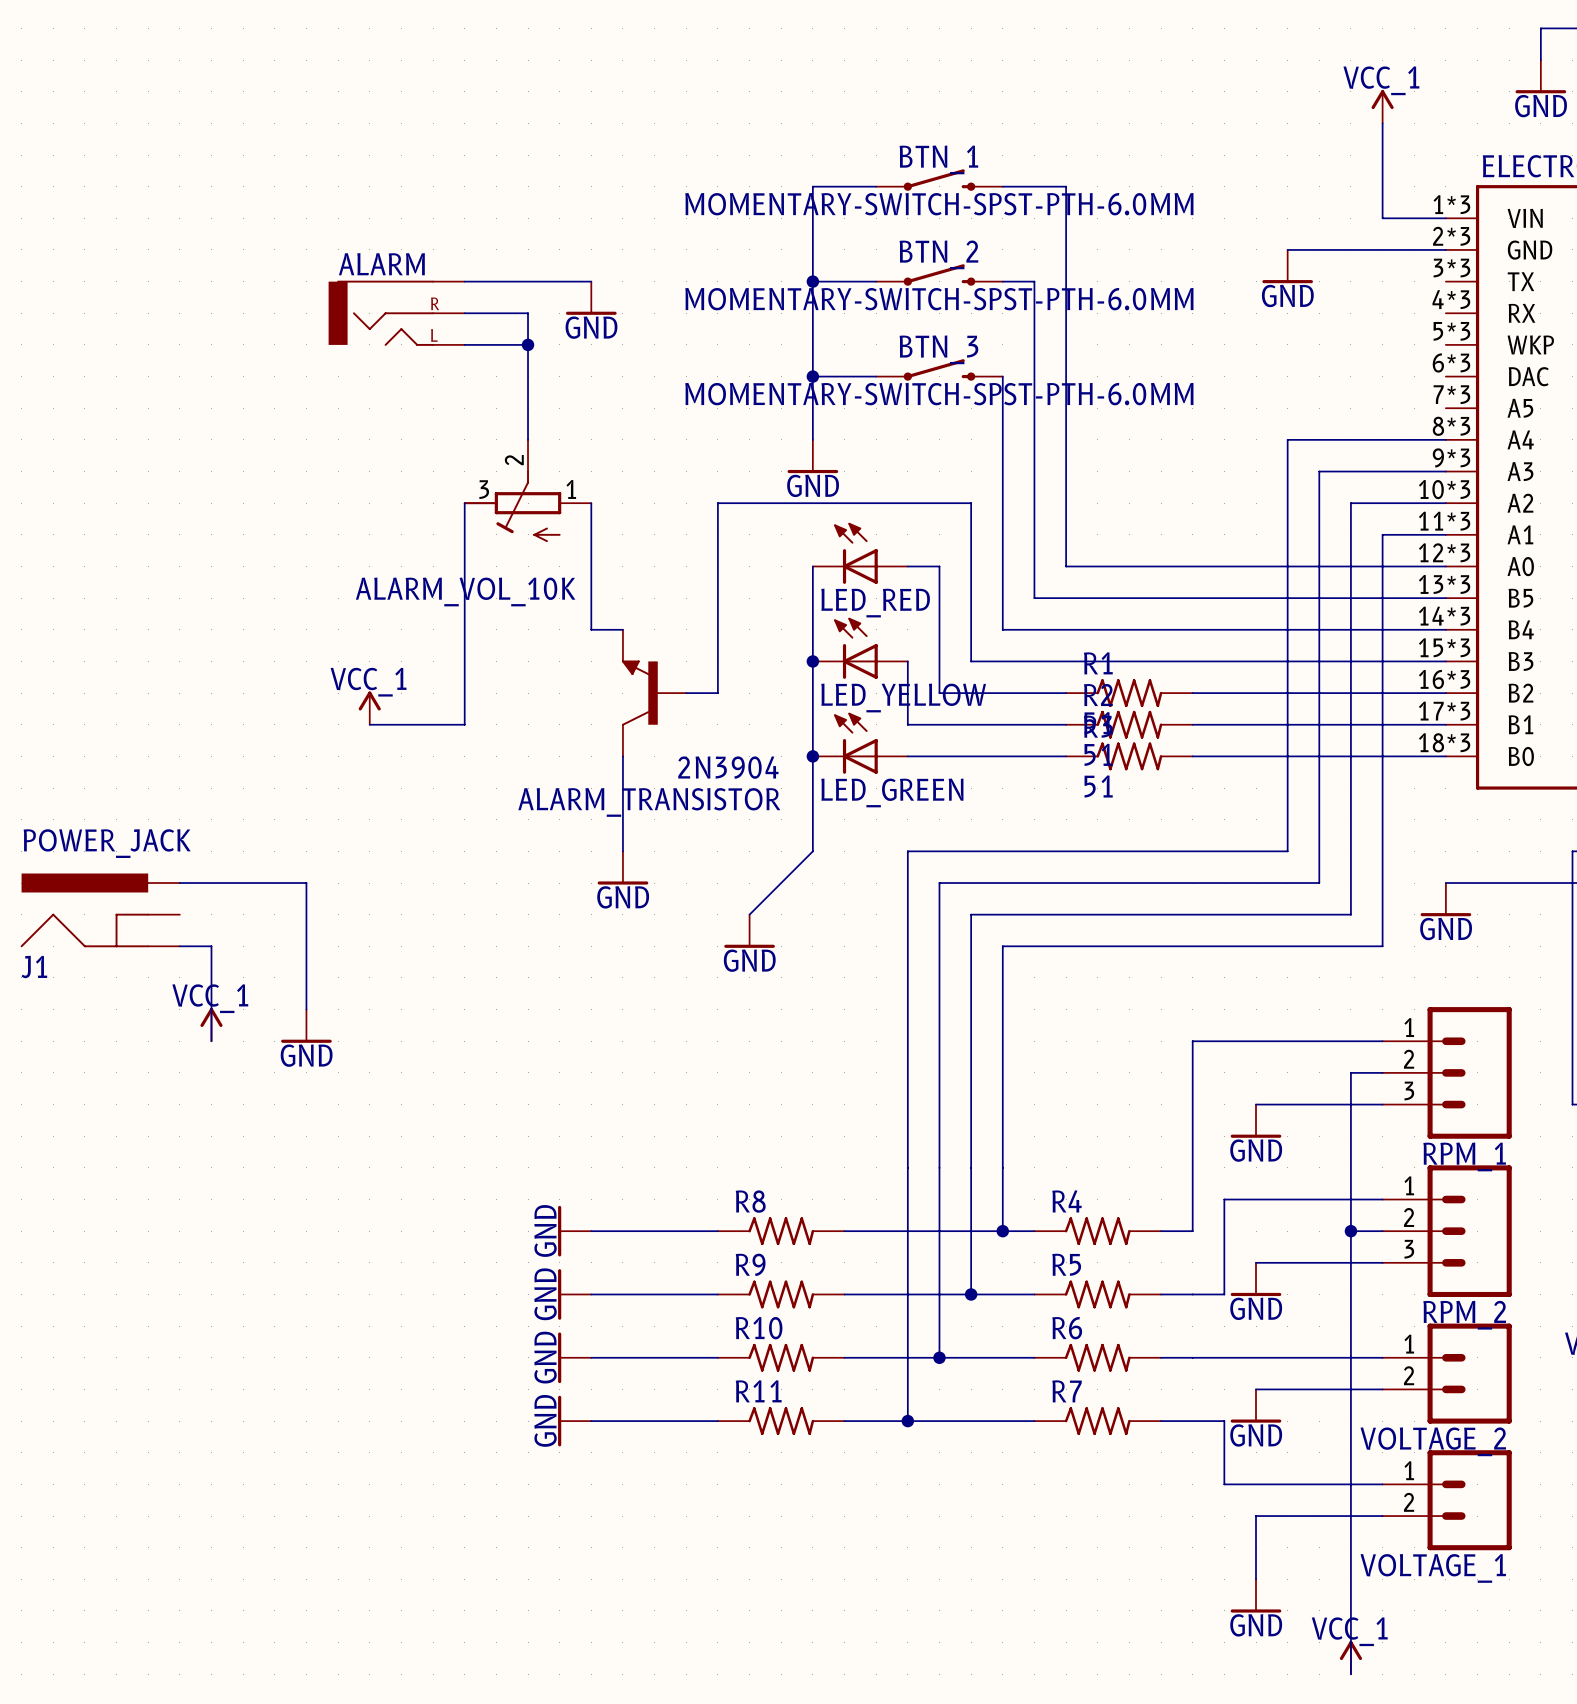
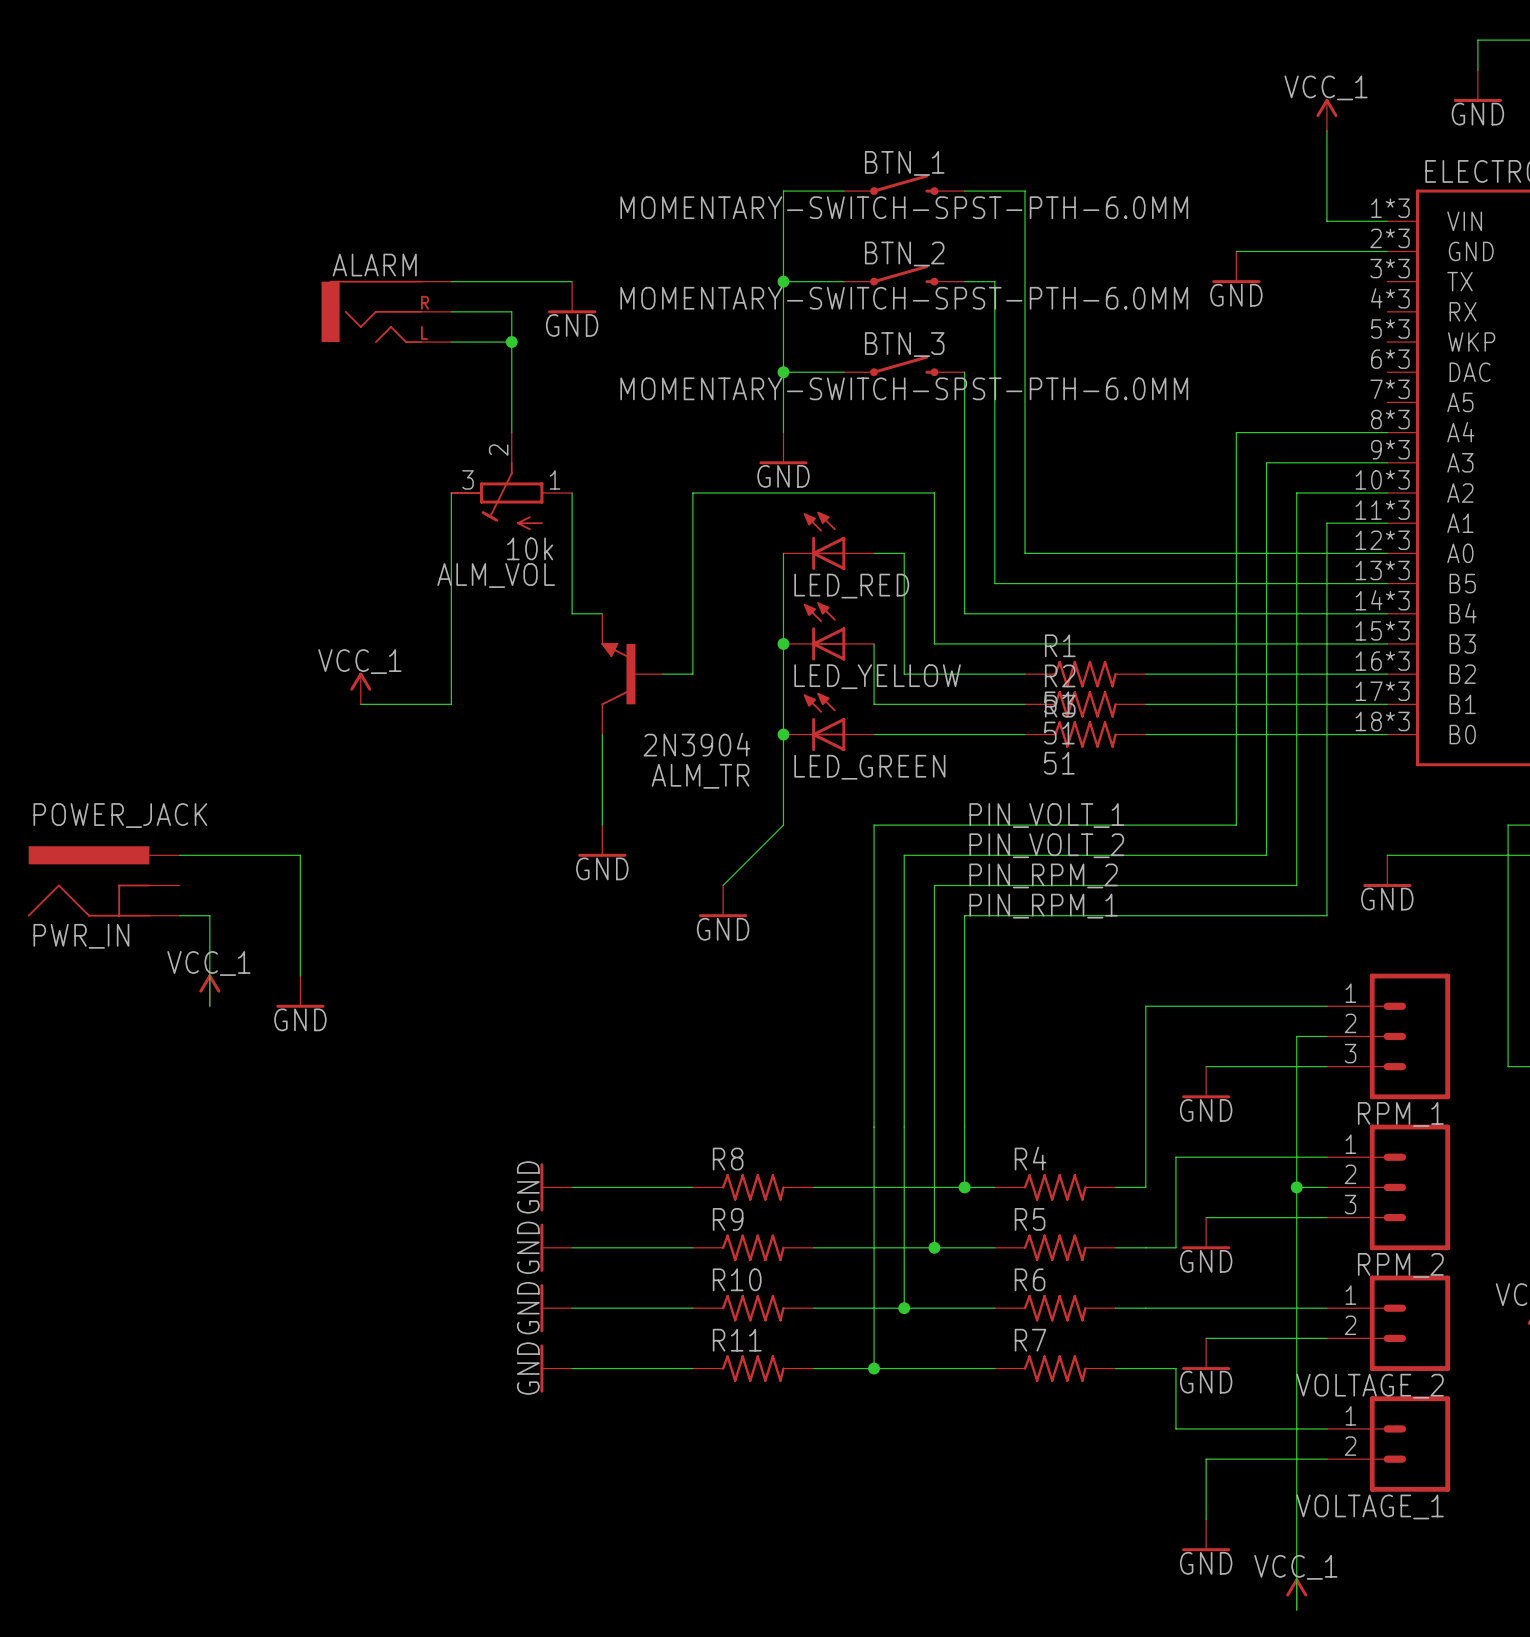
ALARM_VOL_10K value: none -> 10k (530, 548)
ALARM_VOL_10K name: ALARM_VOL_10K (465, 591) -> ALM_VOL (496, 575)
ALARM_TRANSISTOR name: ALARM_TRANSISTOR (649, 802) -> ALM_TR (700, 776)
label: none -> PIN_VOLT_1 (1046, 815)
label: none -> PIN_VOLT_2 (1046, 845)
label: none -> PIN_RPM_2 (1043, 875)
label: none -> PIN_RPM_1 (1043, 906)
J1 name: J1 (34, 967) -> PWR_IN (81, 936)

